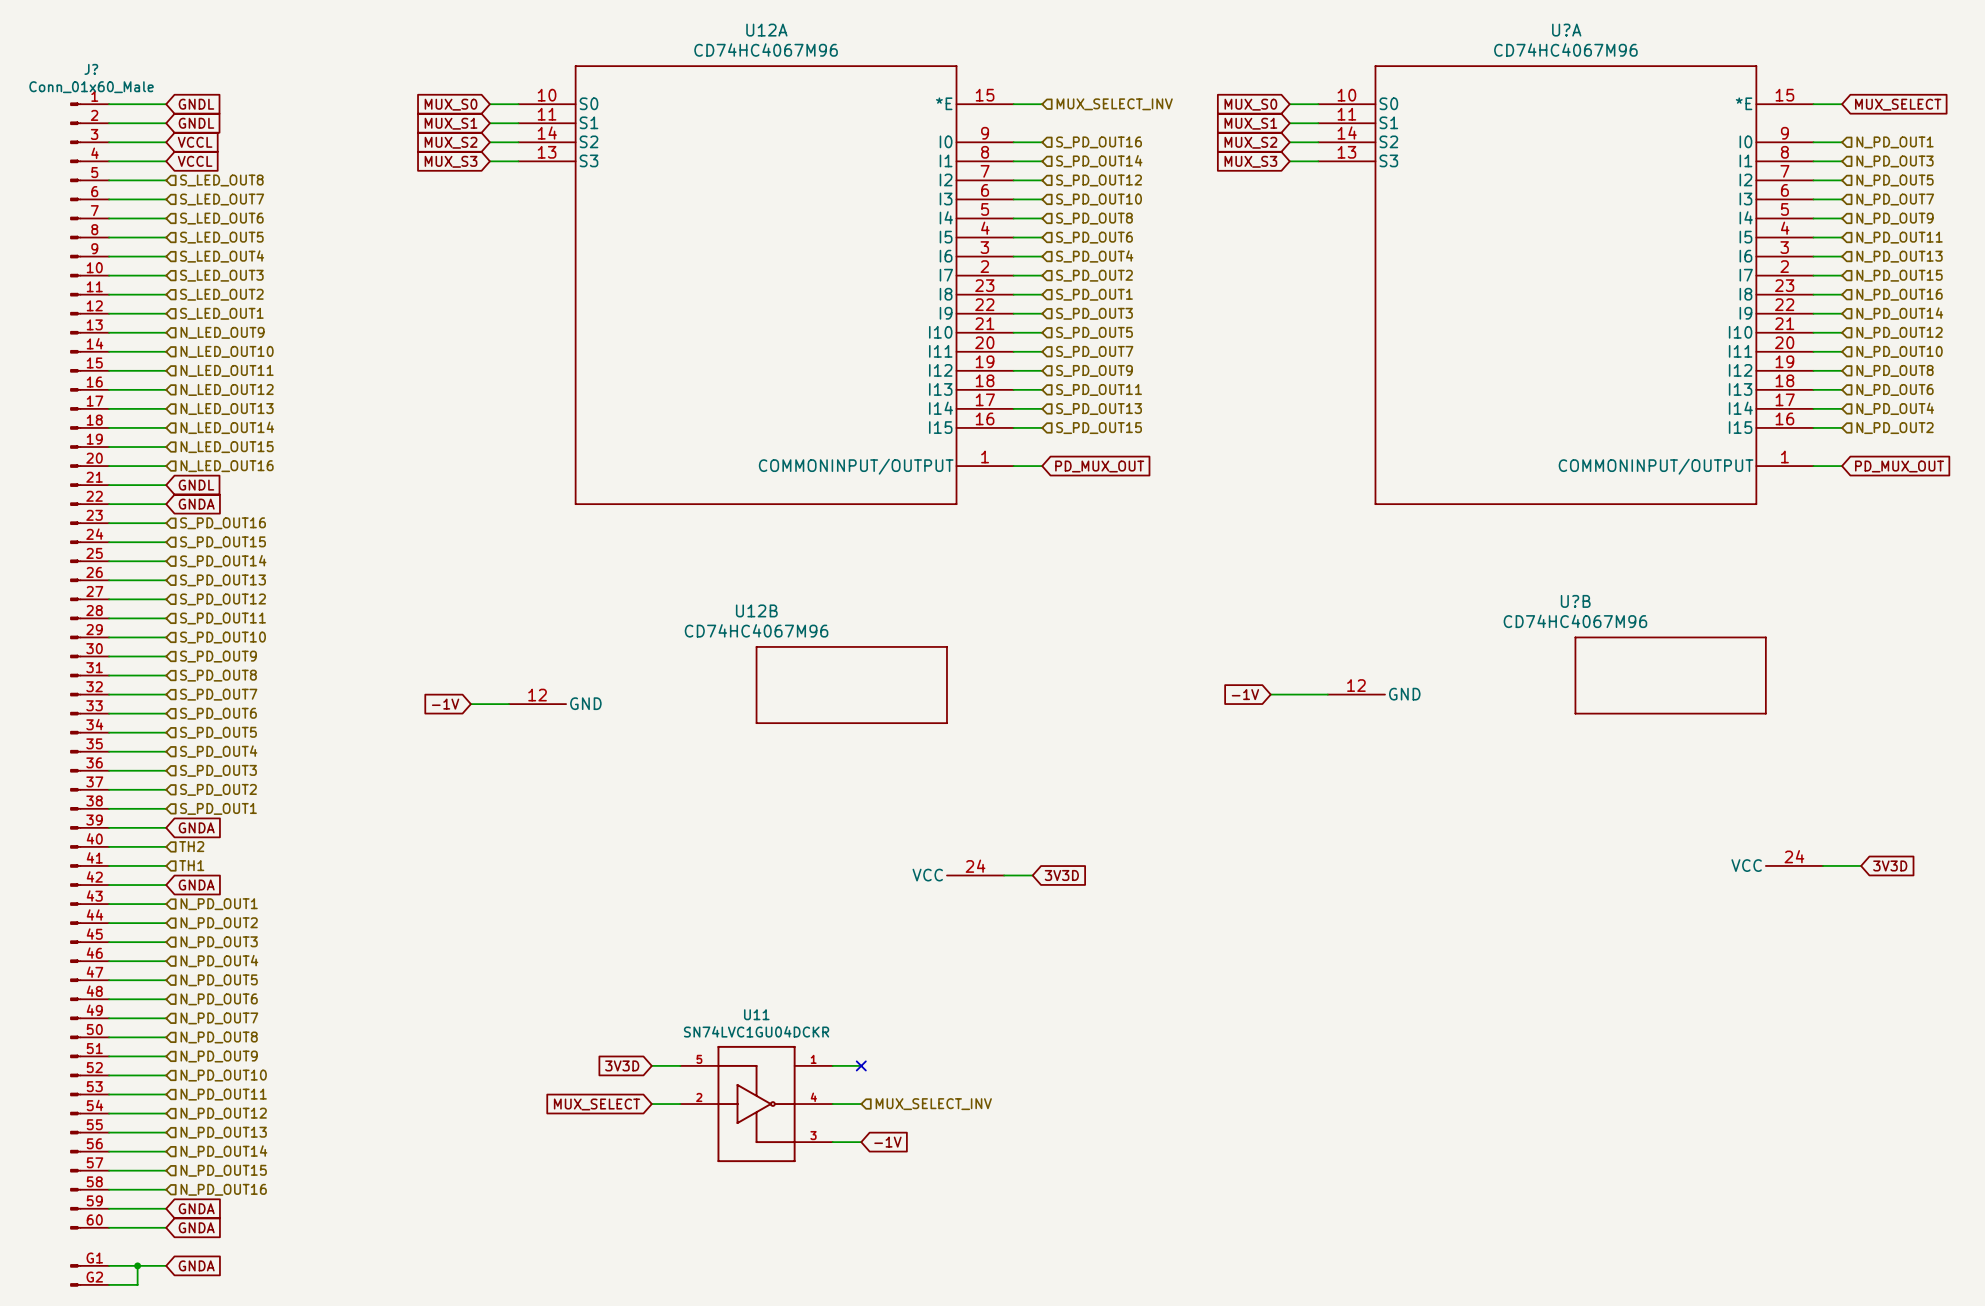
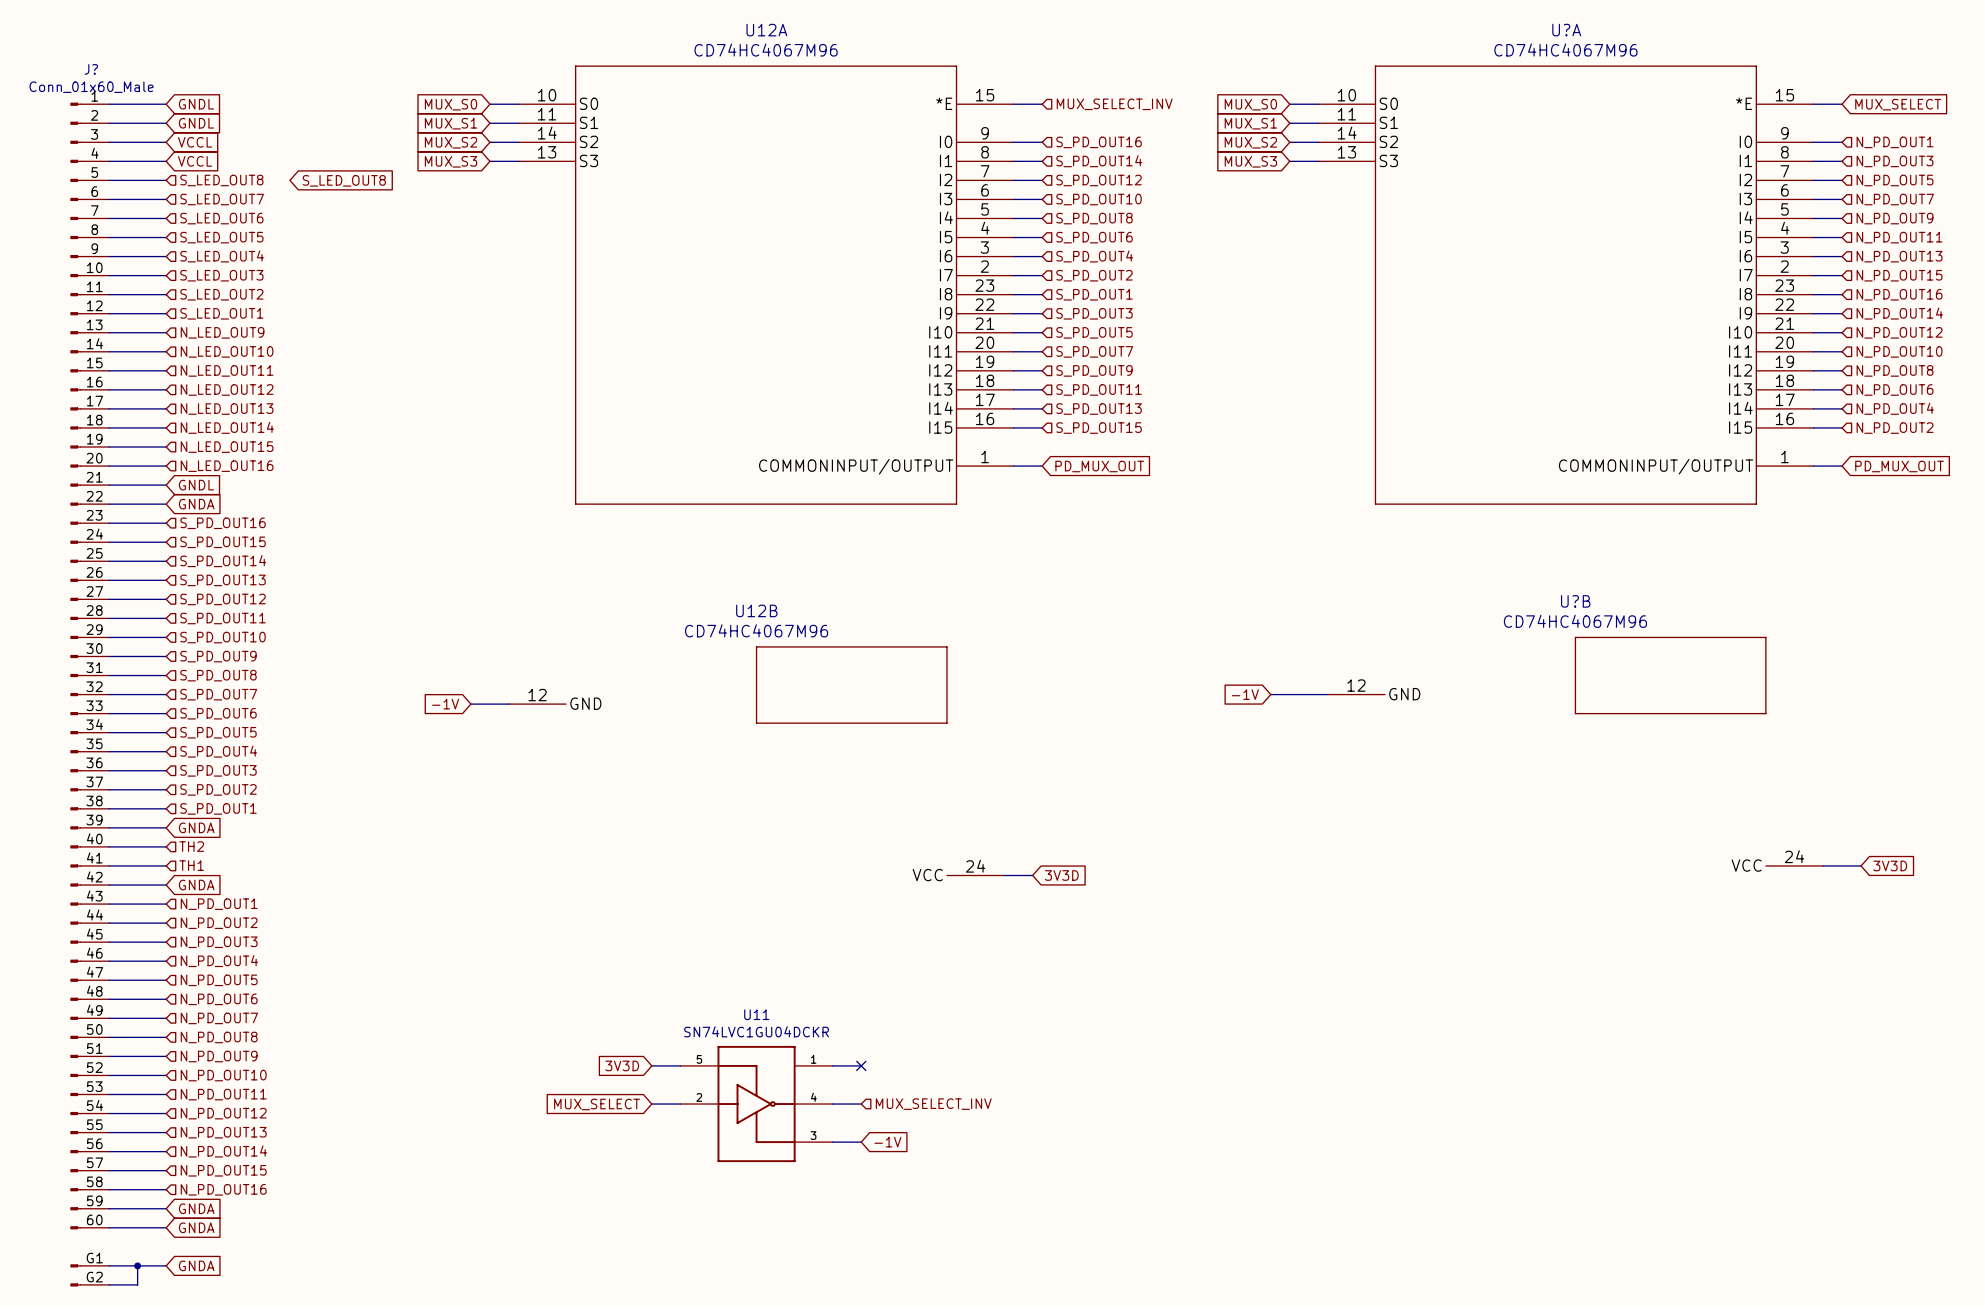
global label: none -> S_LED_OUT8 (344, 180)

